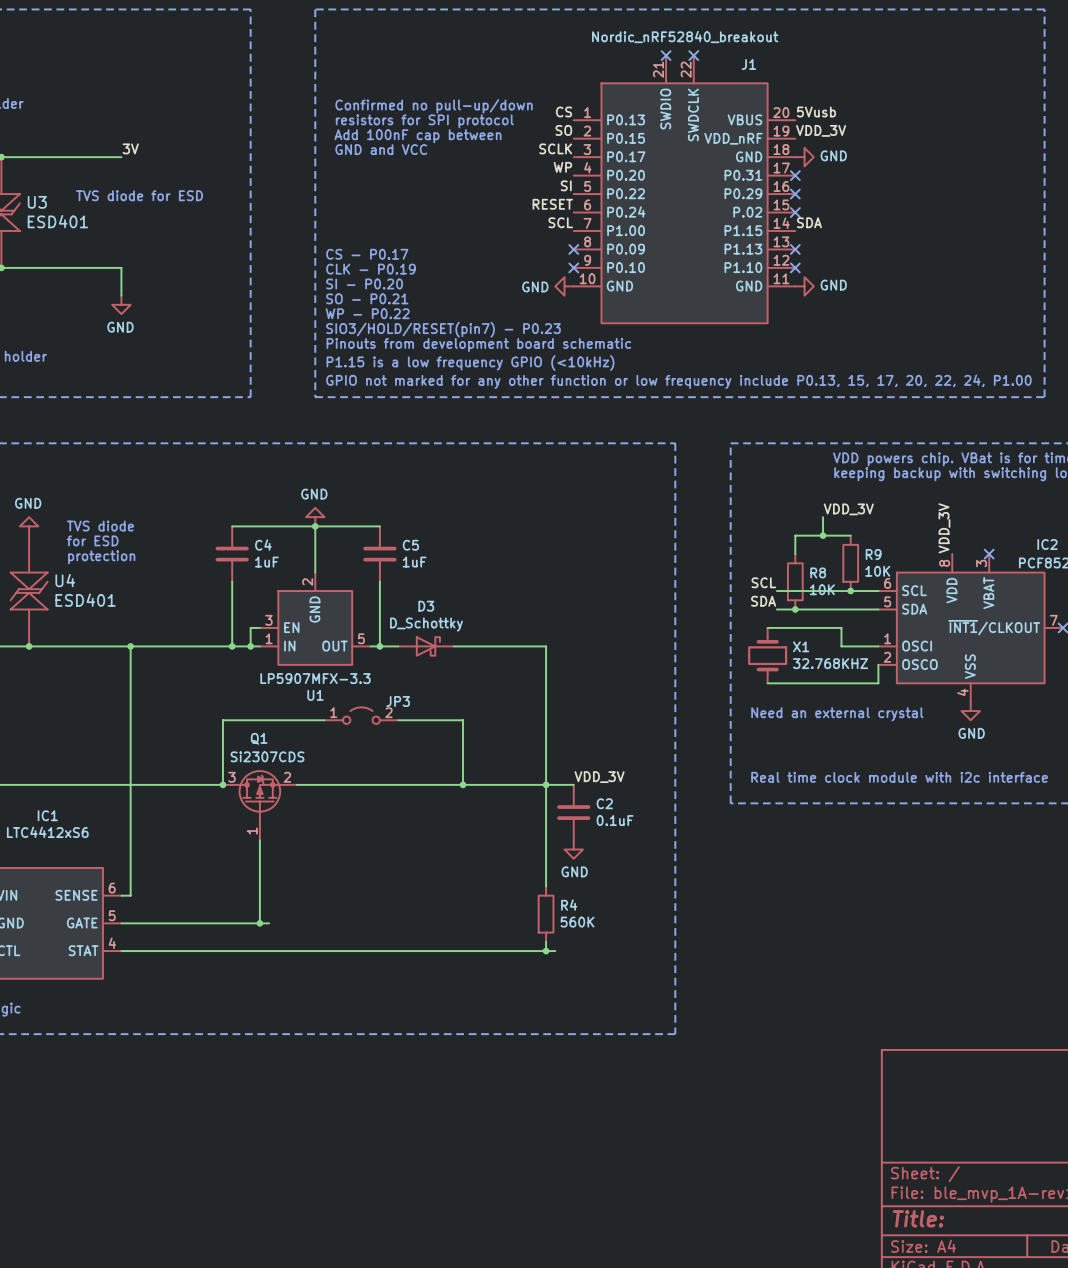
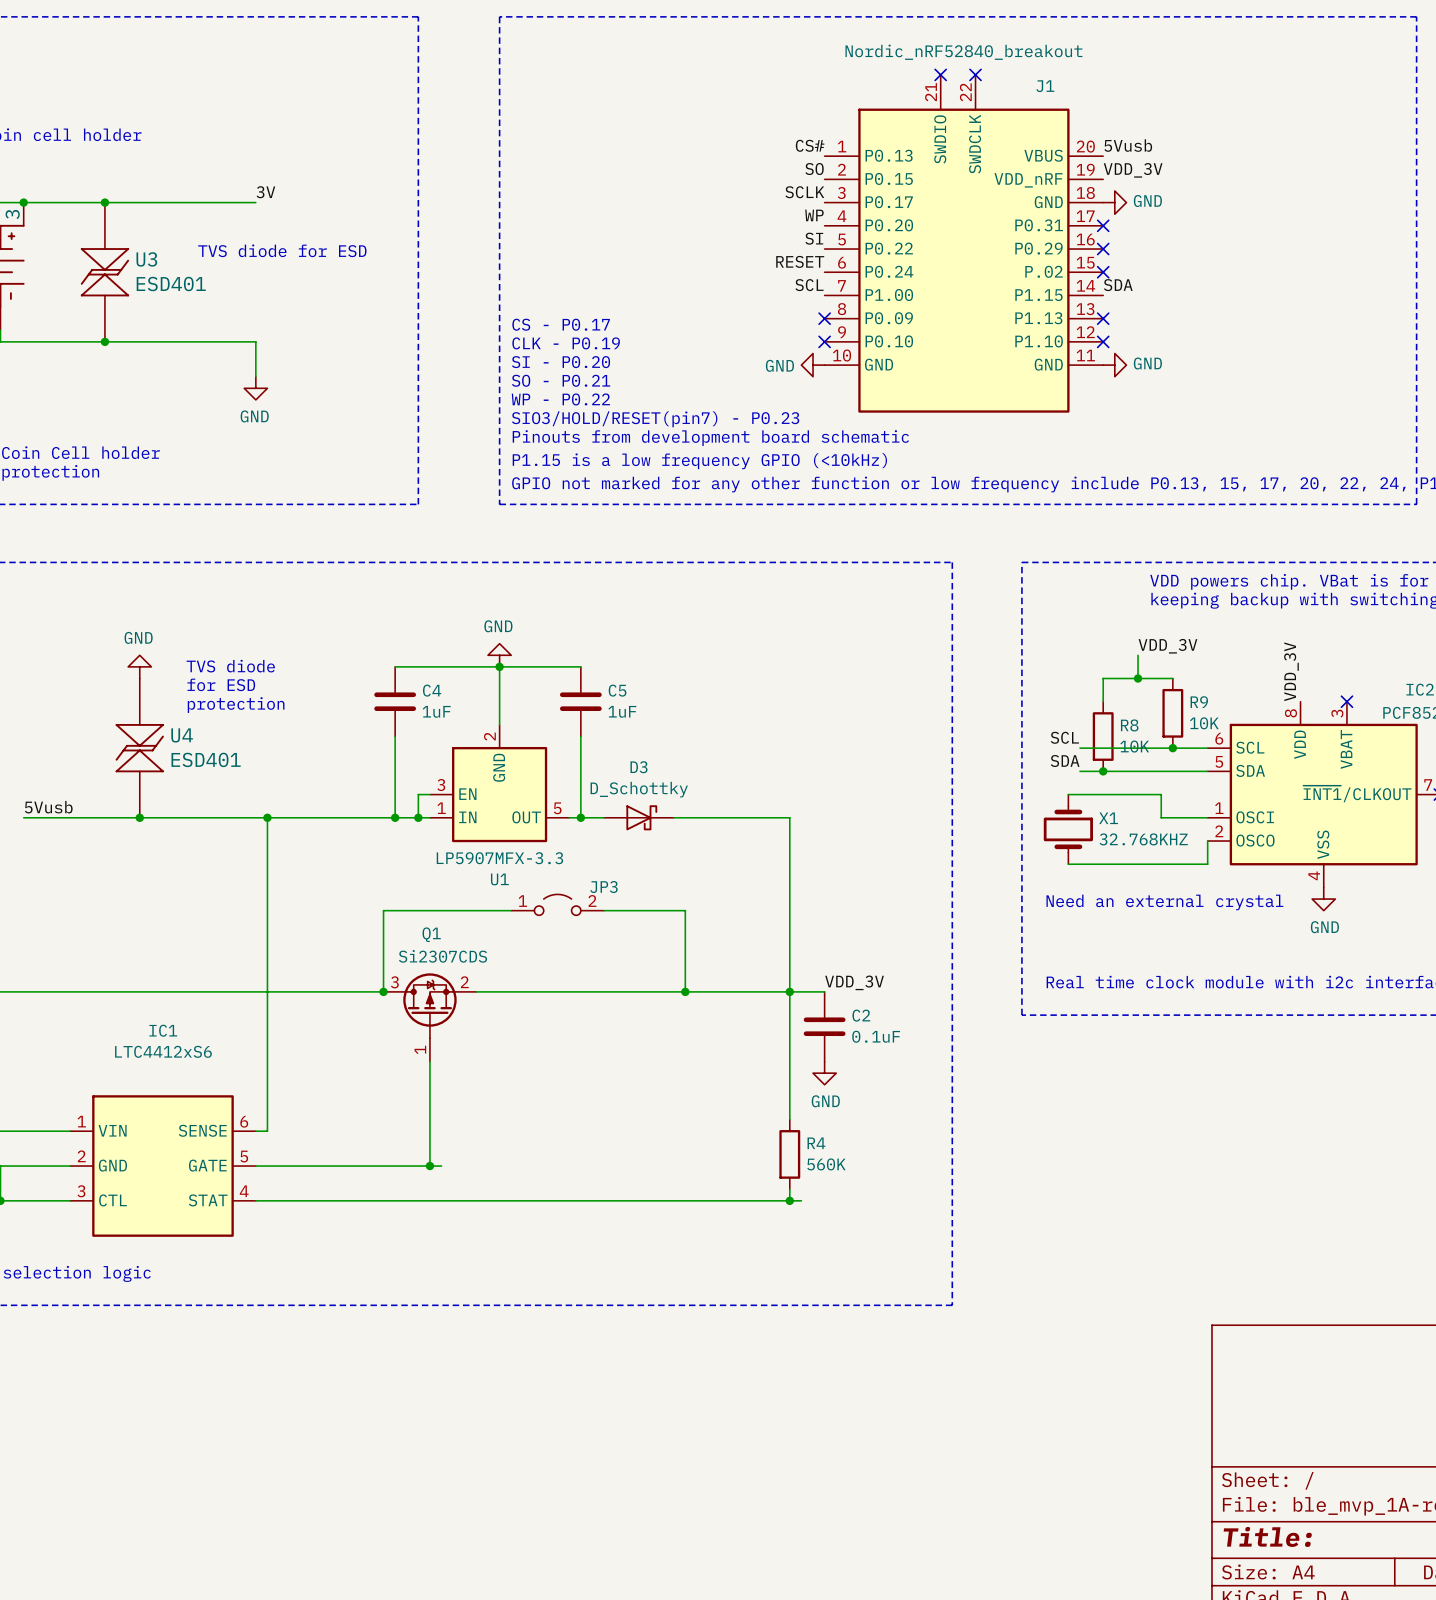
text: Confirmed no pull-up/down (434, 106) -> none
label: CS (564, 111) -> CS# (810, 145)
text: resistors for SPI protocol (424, 121) -> none
text: Add 100nF cap between (418, 136) -> none
text: GND and VCC (381, 149) -> none

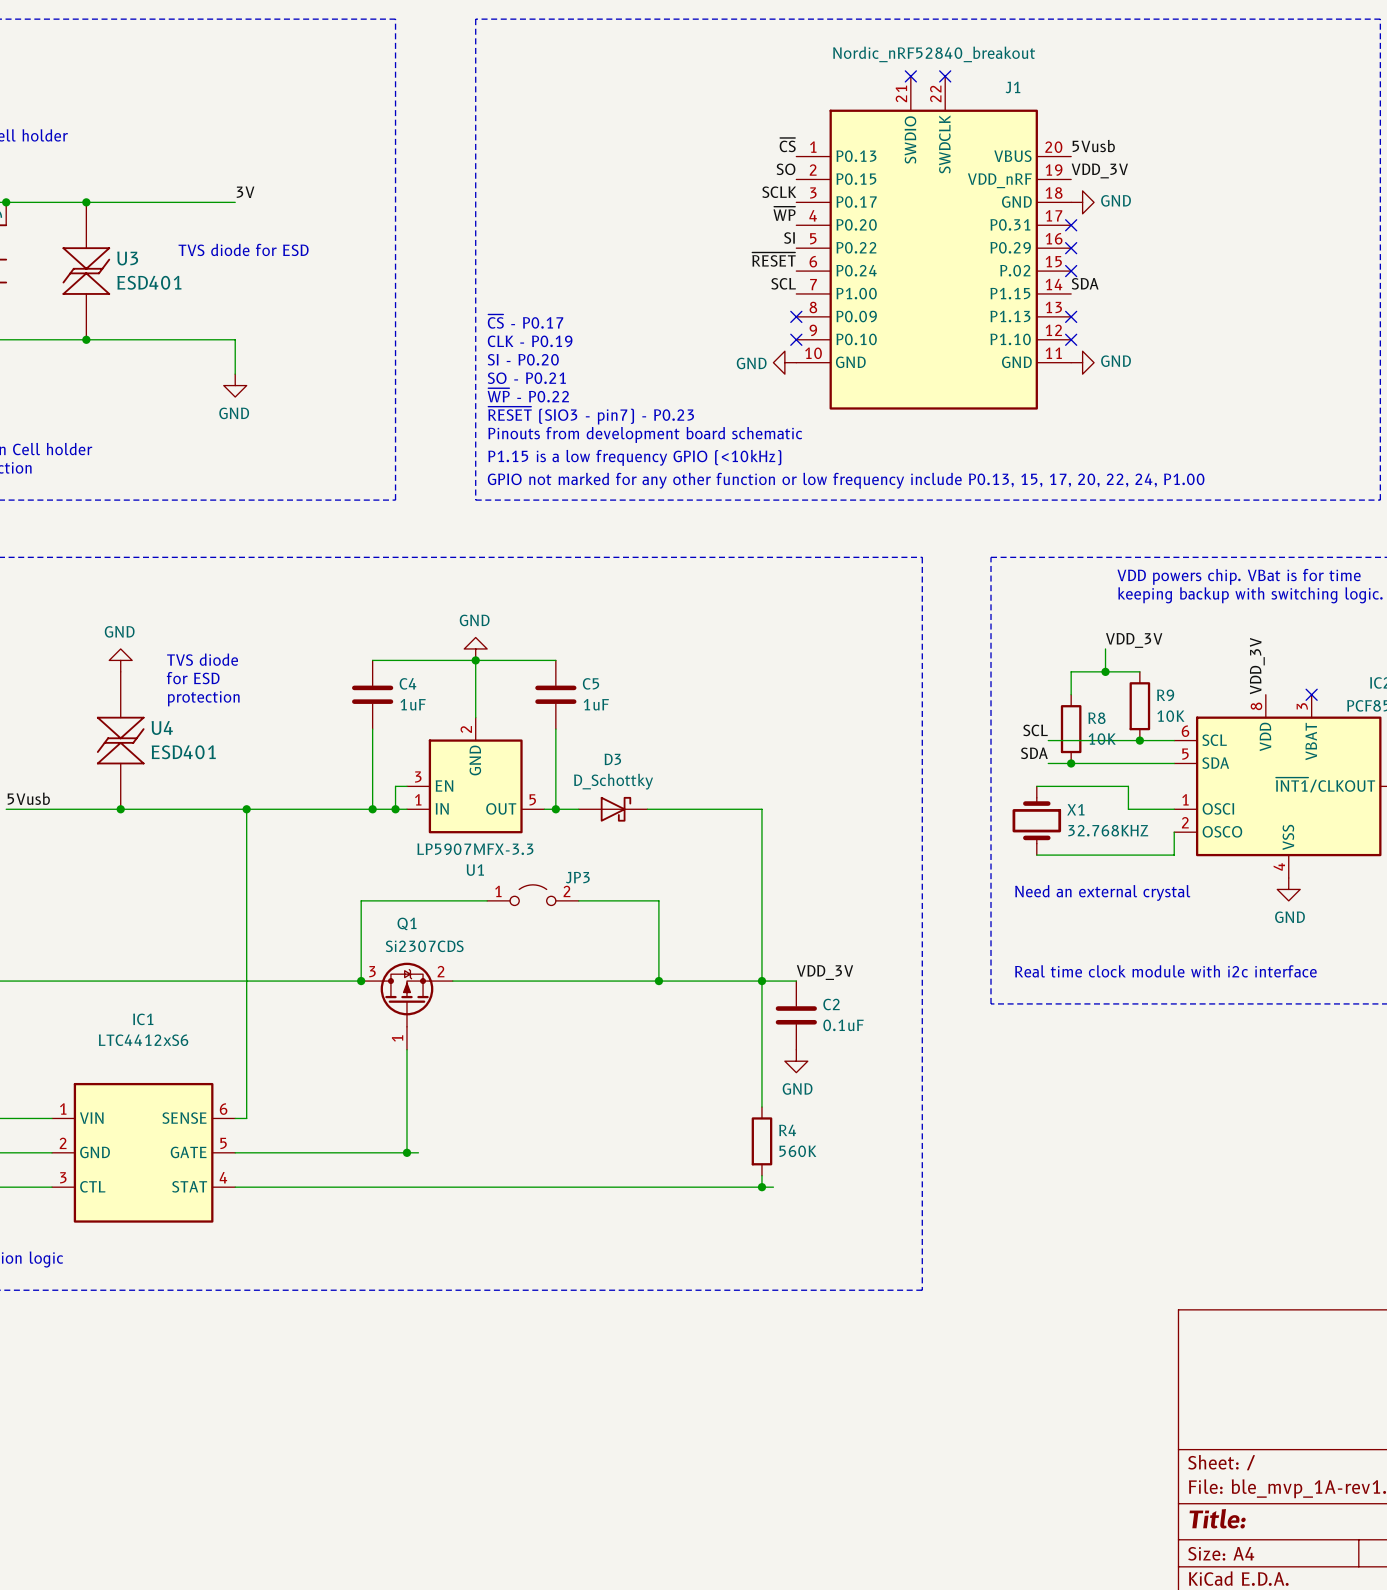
label: CS# (810, 145) -> ~{CS} (787, 145)
label: WP (814, 215) -> ~{WP} (784, 213)
label: RESET (800, 261) -> ~{RESET} (773, 259)
text: CS - P0.17 (561, 324) -> ~{CS} - P0.17 (525, 321)
text: WP - P0.22 (560, 399) -> ~{WP} - P0.22 (528, 395)
text: SIO3/HOLD/RESET(pin7) - P0.23 (655, 419) -> ~{RESET} (SIO3 - pin7) - P0.23 (591, 415)

